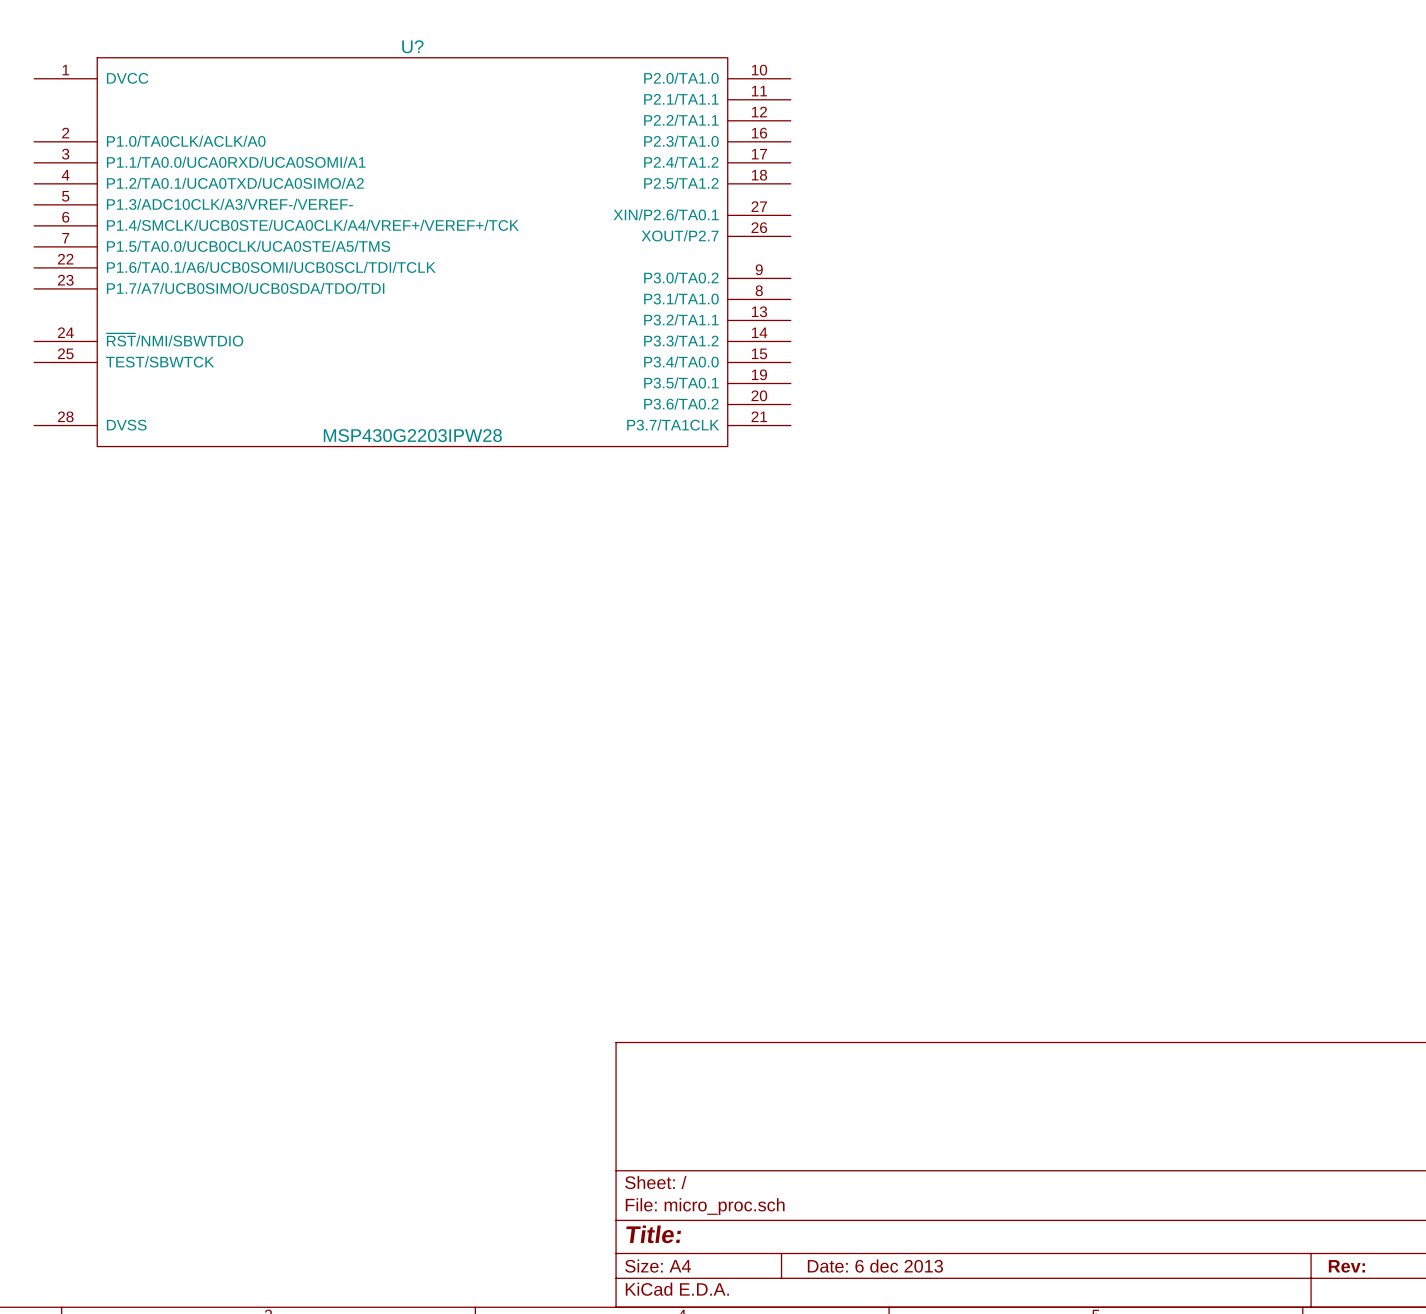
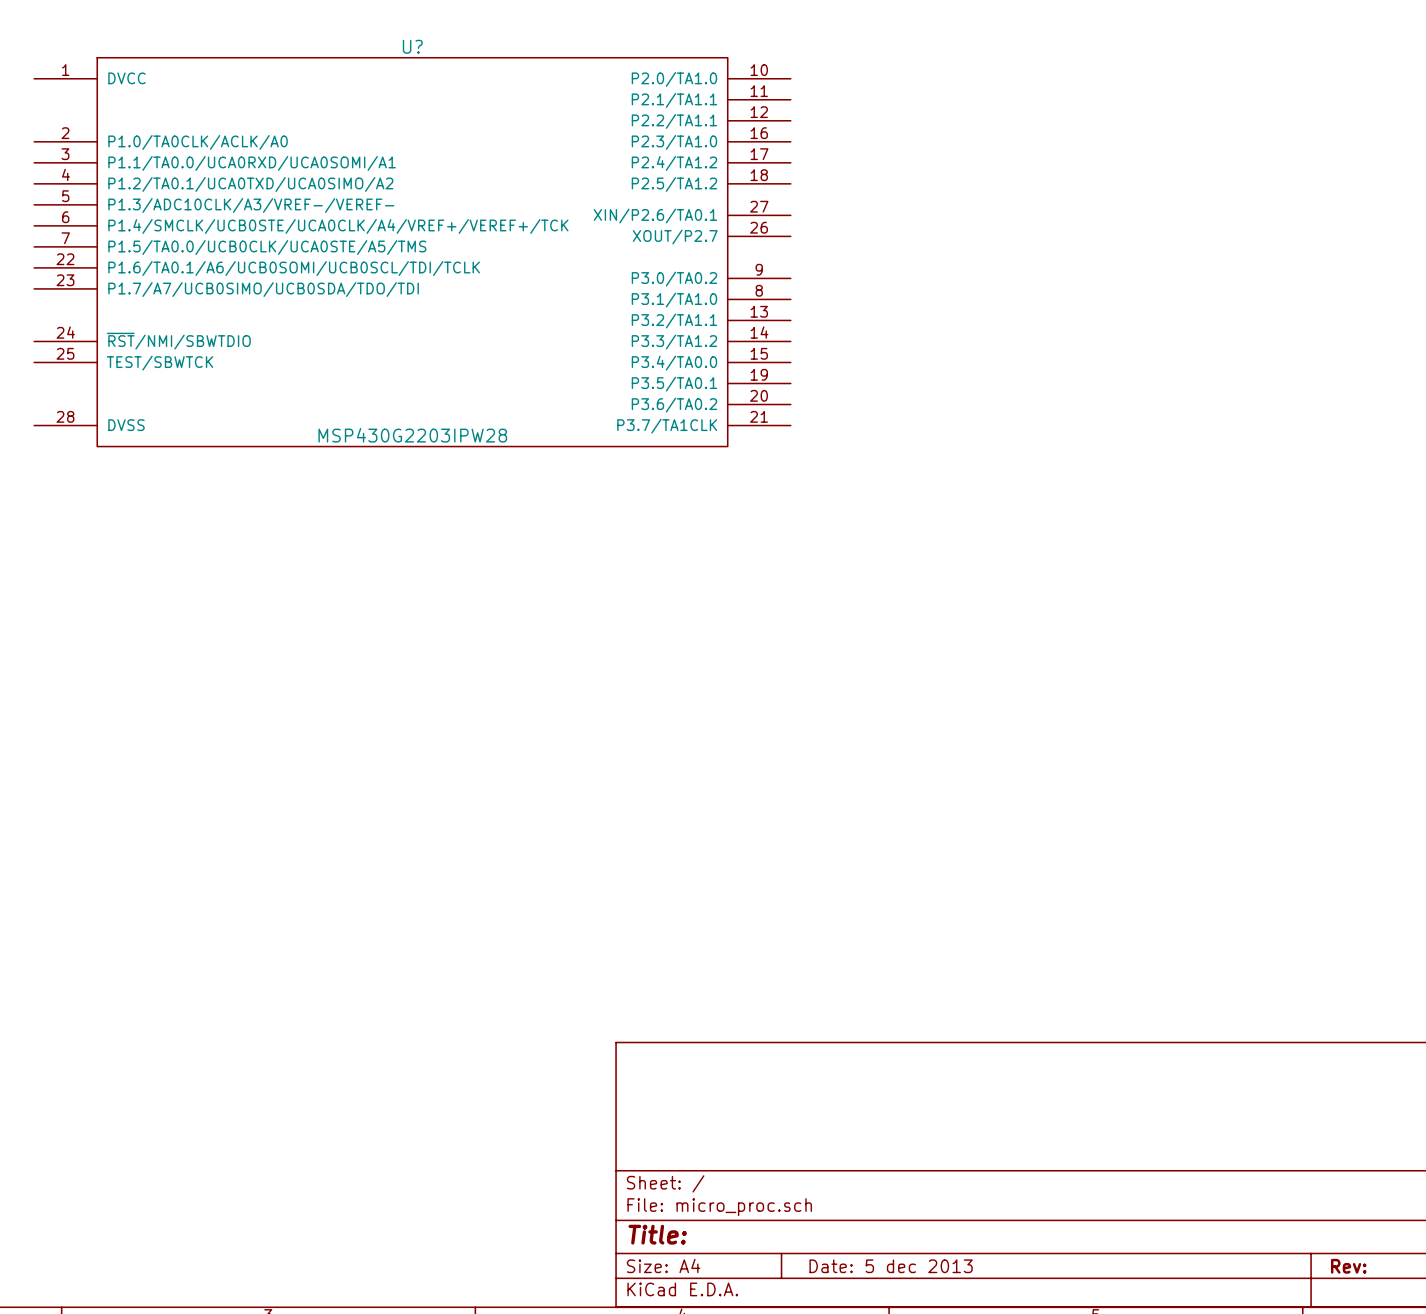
title block: Date: 6 dec 2013 (875, 1266) -> Date: 5 dec 2013 (891, 1266)

